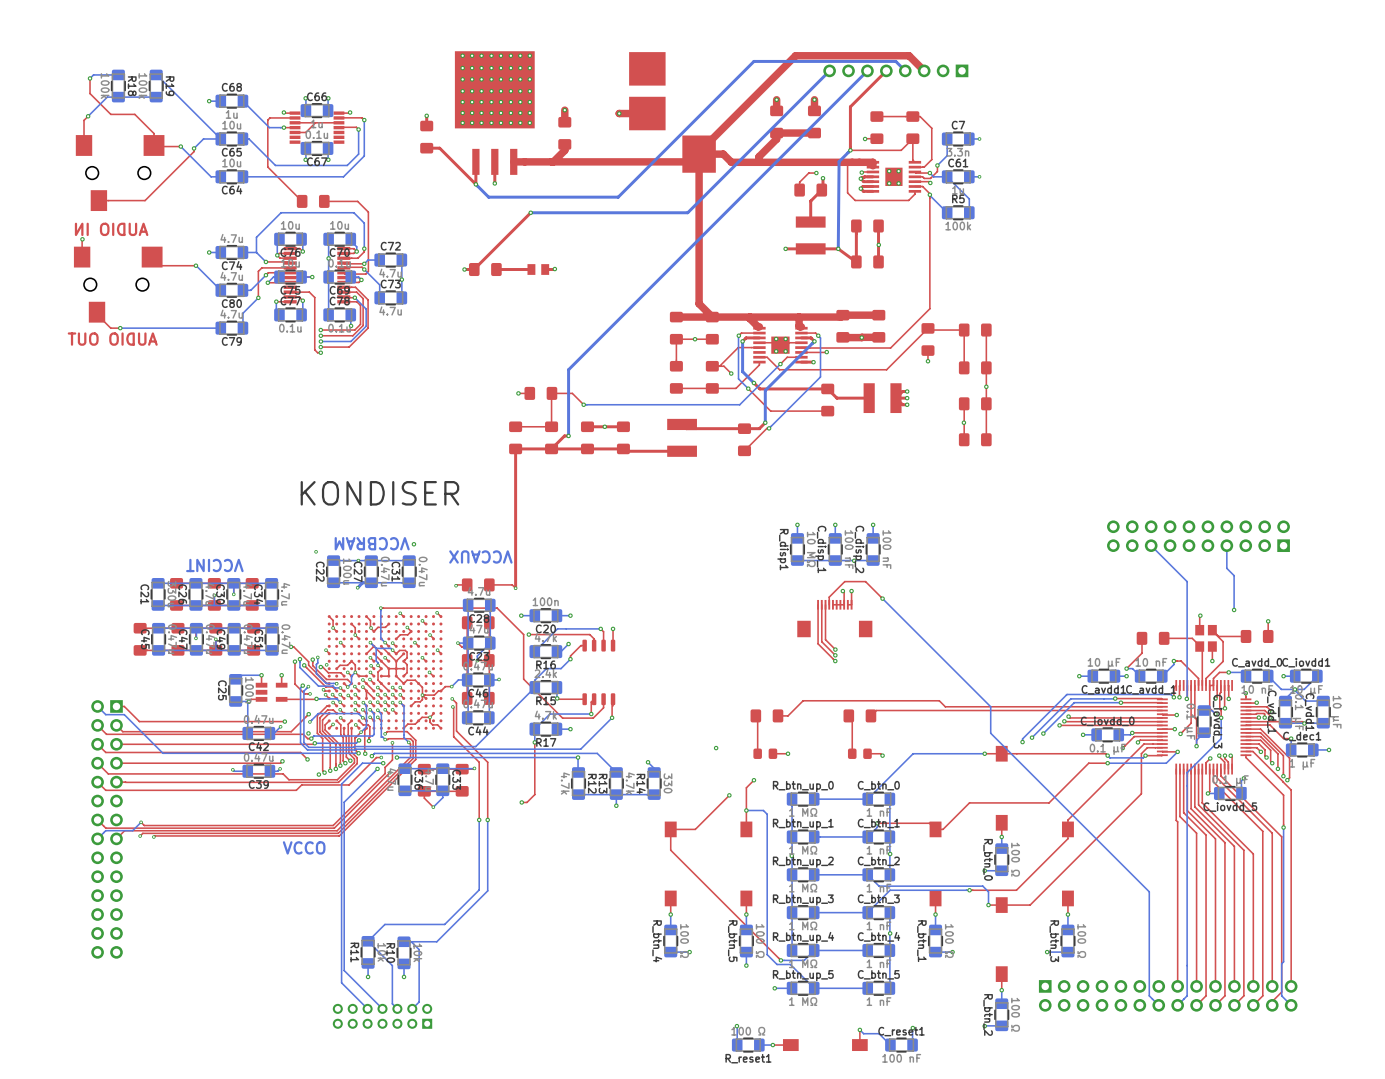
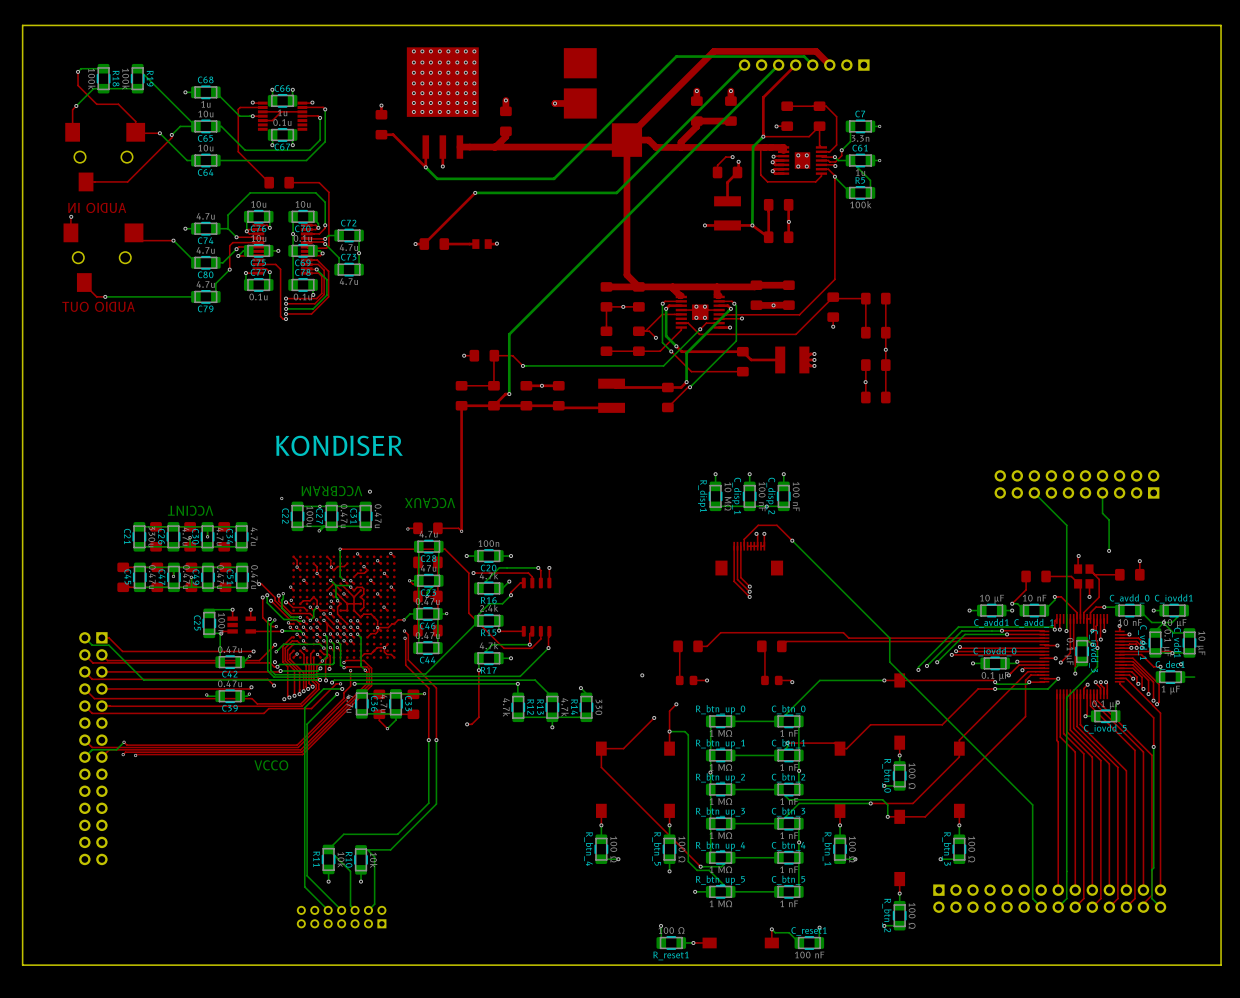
board edge: none -> (1221, 25) (22, 25) (22, 965) (1221, 965) (1221, 25)
via position: (1328, 749) -> (1180, 664)

